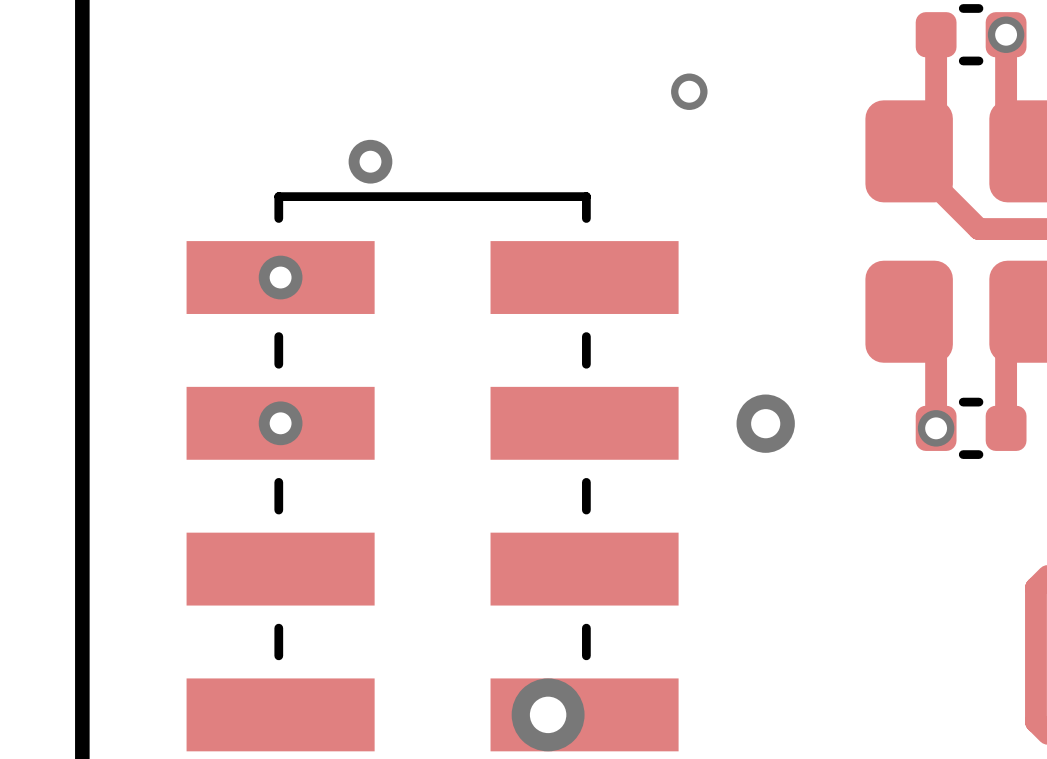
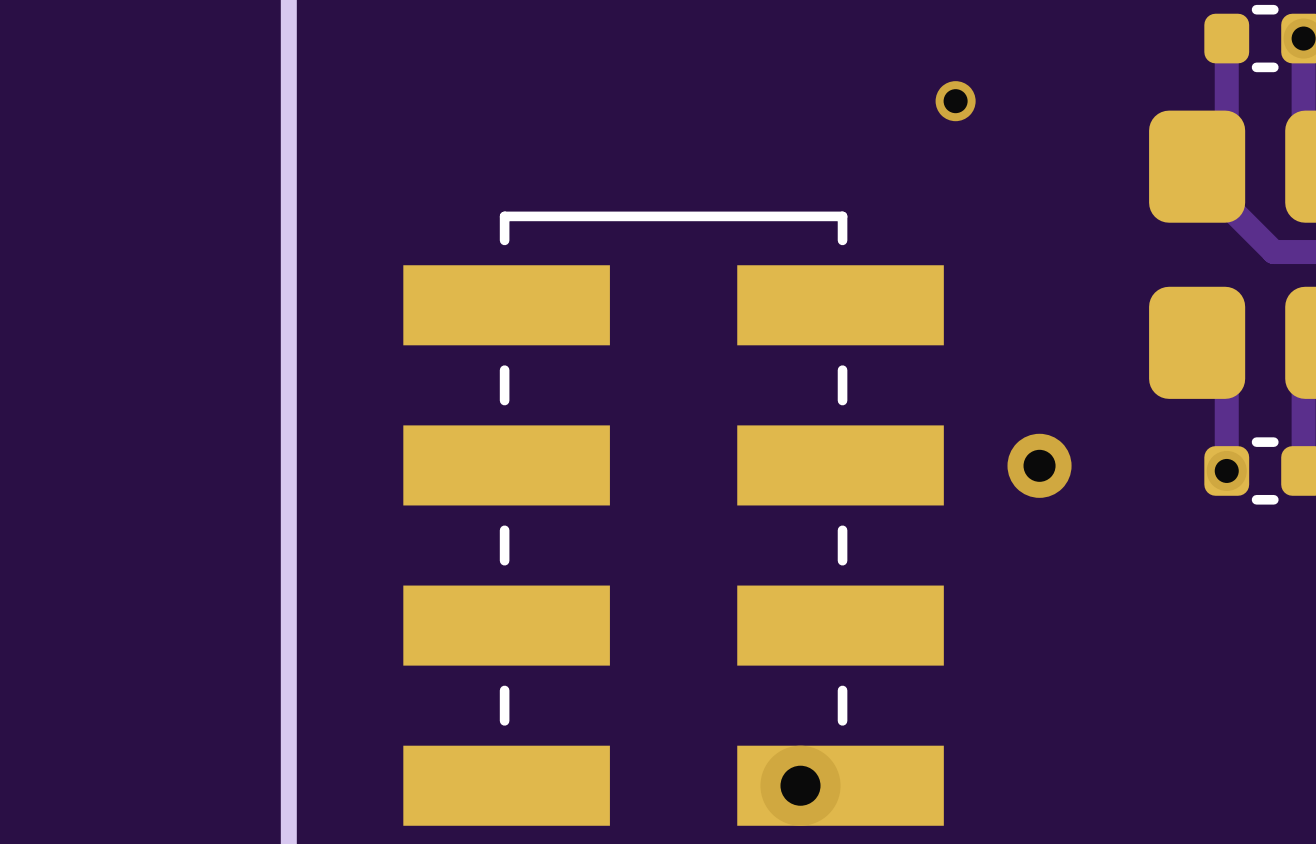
via: (370, 161) -> none
via: (280, 277) -> none
via: (280, 423) -> none

